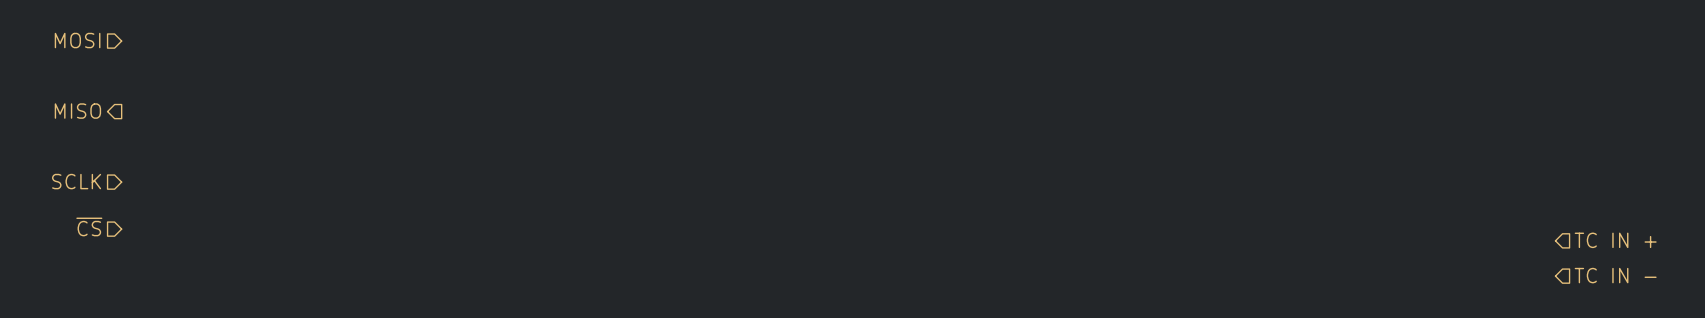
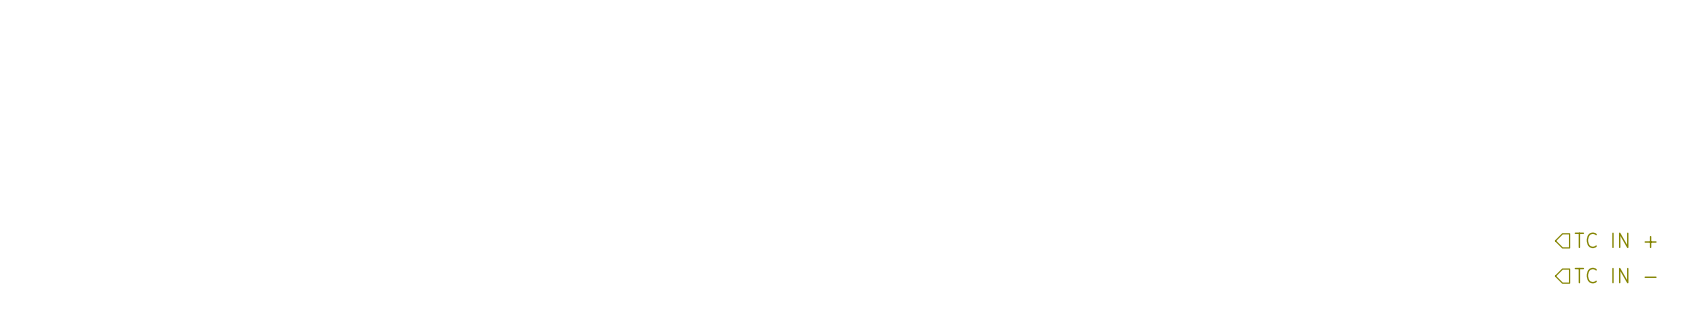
hierarchical label: MOSI (77, 40) -> none
hierarchical label: MISO (77, 111) -> none
hierarchical label: SCLK (76, 181) -> none
hierarchical label: ~{CS} (89, 226) -> none

